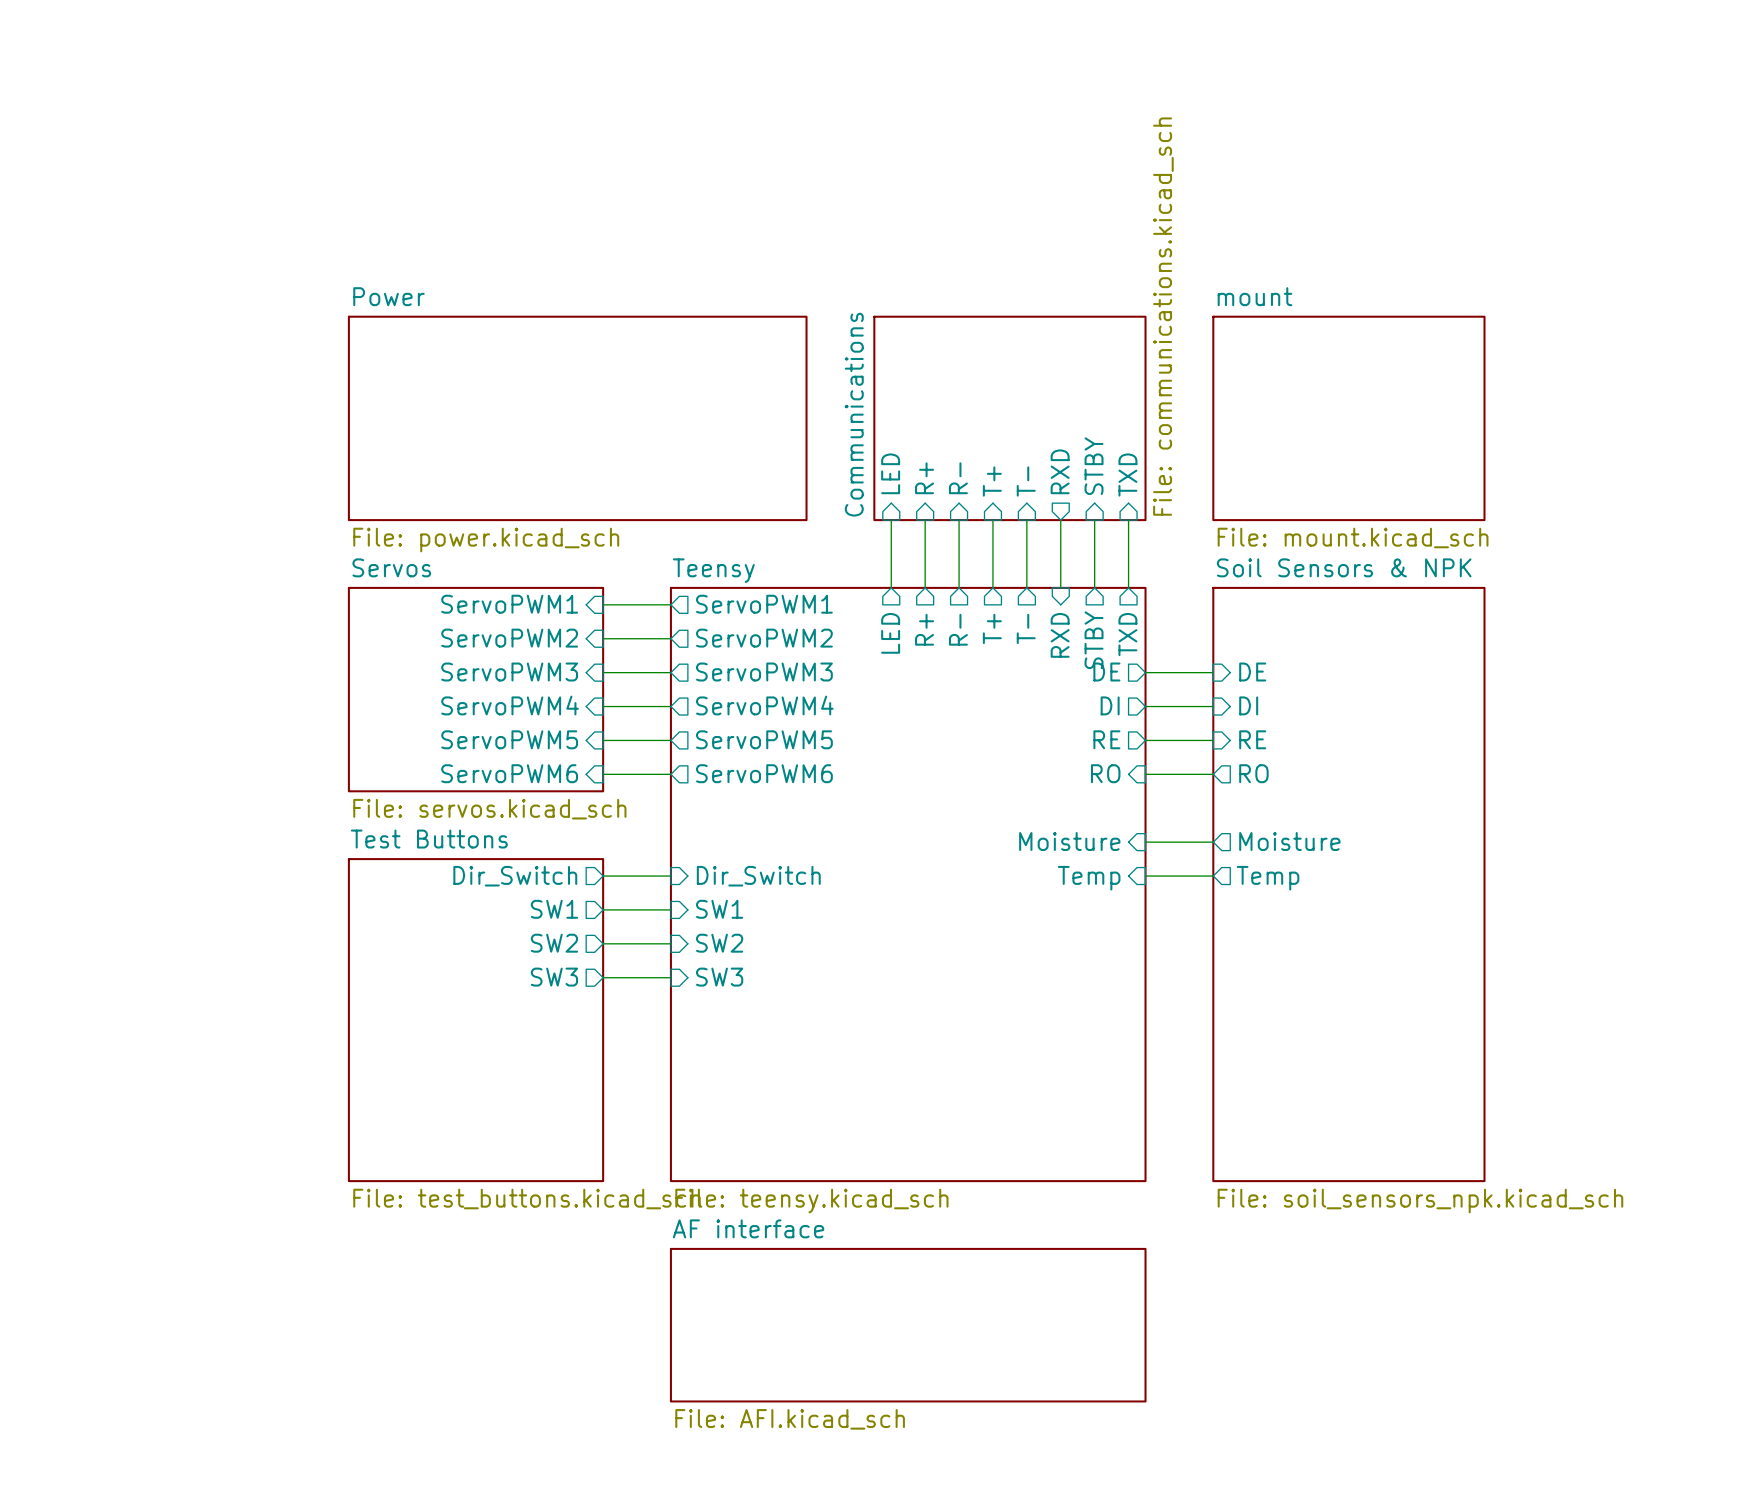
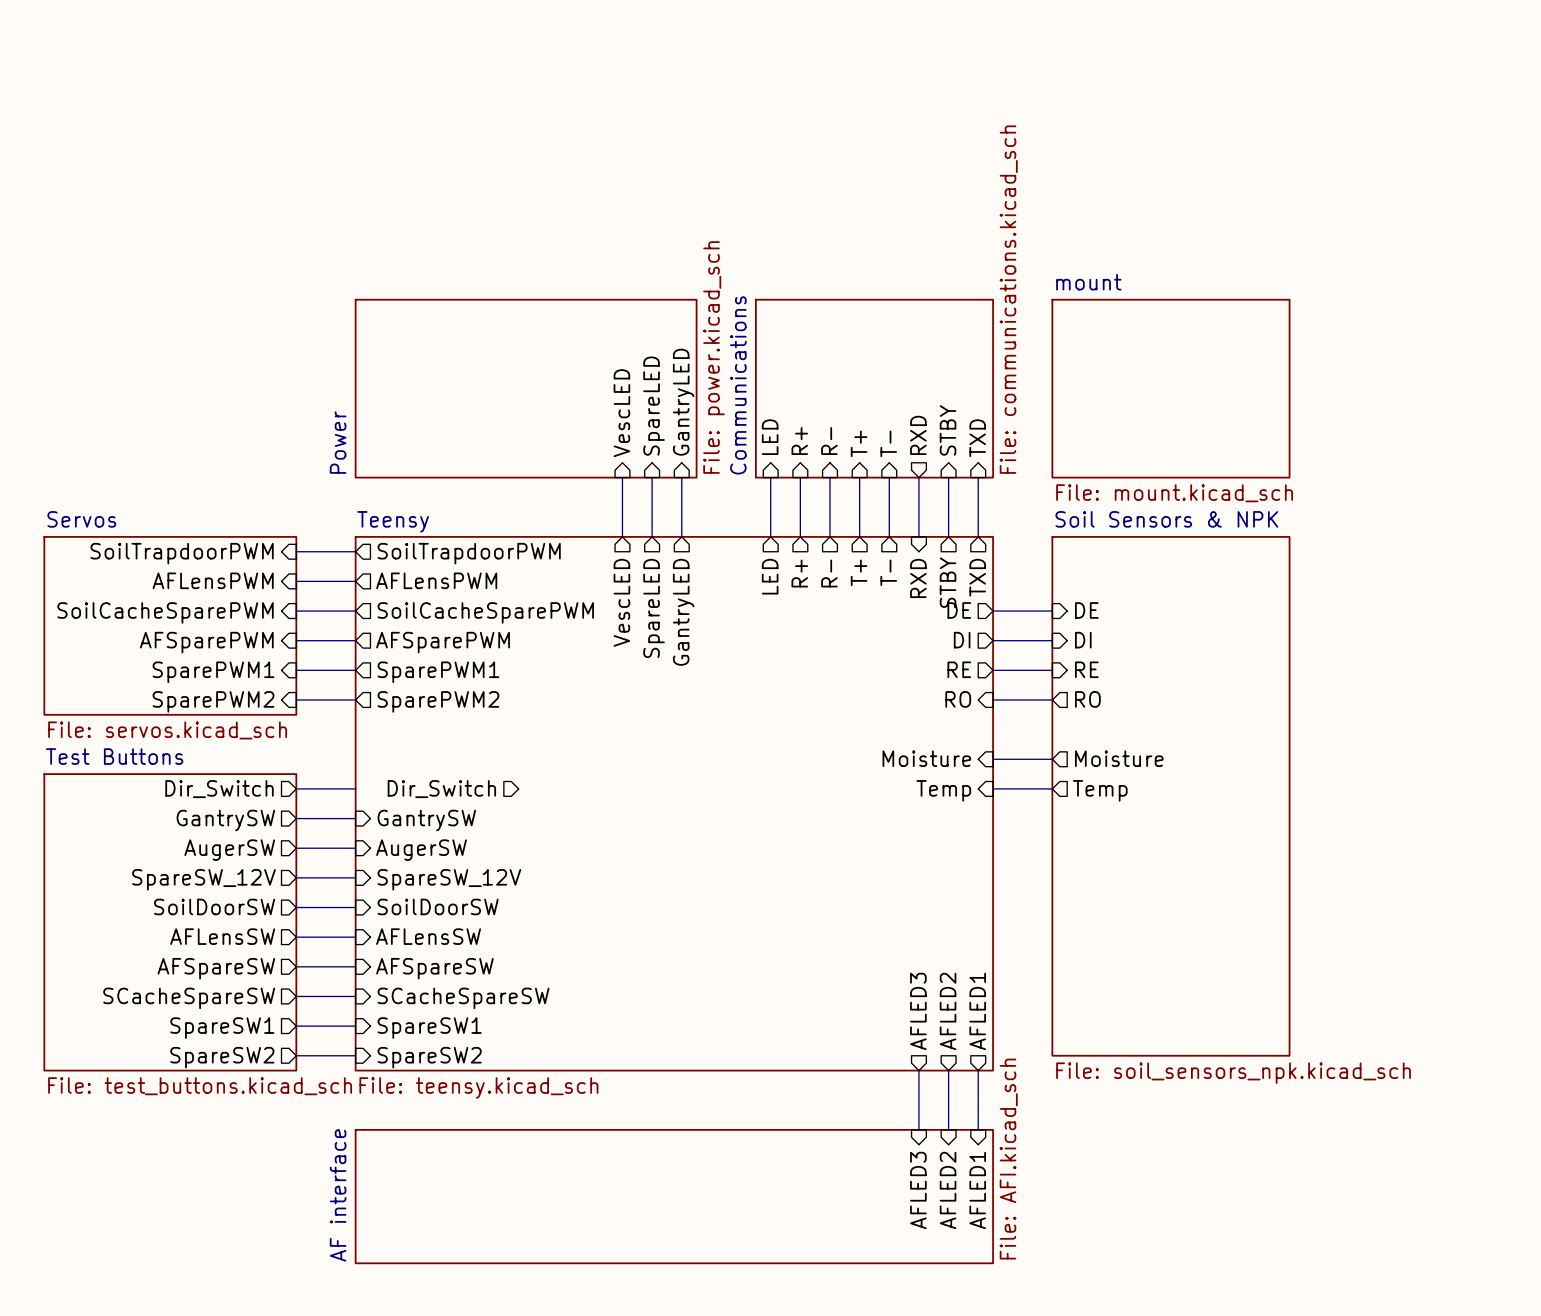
sheet Power: File: power.kicad_sch (577, 418) -> none
sheet Power: none -> File: power.kicad_sch (526, 388)
sheet pin: none -> GantryLED (683, 402)
sheet pin: none -> SpareLED (654, 406)
sheet pin: none -> VescLED (621, 413)
wire: none -> (622, 477) (622, 536)
wire: none -> (652, 477) (652, 536)
wire: none -> (681, 477) (681, 536)
sheet pin: ServoPWM1 (509, 604) -> none
wire: (603, 604) (670, 604) -> (296, 551) (355, 551)
sheet pin: ServoPWM1 (764, 604) -> none
sheet pin: none -> SoilTrapdoorPWM (182, 553)
sheet pin: none -> SoilTrapdoorPWM (469, 553)
sheet pin: none -> AFLensPWM (213, 580)
sheet pin: ServoPWM2 (509, 638) -> none
sheet pin: none -> AFLensPWM (436, 580)
wire: (603, 638) (670, 638) -> (296, 581) (355, 581)
sheet pin: ServoPWM2 (764, 638) -> none
sheet pin: none -> VescLED (621, 602)
sheet pin: none -> SpareLED (654, 608)
sheet pin: ServoPWM3 (509, 672) -> none
wire: (603, 672) (670, 672) -> (296, 611) (355, 611)
sheet pin: ServoPWM3 (764, 672) -> none
sheet pin: none -> SoilCacheSparePWM (165, 612)
sheet pin: none -> SoilCacheSparePWM (485, 612)
sheet pin: none -> GantryLED (683, 612)
sheet Servos: none -> File: servos.kicad_sch (170, 625)
sheet Servos: File: servos.kicad_sch (476, 689) -> none
sheet pin: ServoPWM4 (510, 705) -> none
sheet pin: ServoPWM4 (764, 705) -> none
wire: (603, 706) (670, 706) -> (296, 640) (355, 640)
sheet pin: none -> AFSparePWM (206, 642)
sheet pin: none -> AFSparePWM (443, 642)
sheet pin: ServoPWM5 (509, 739) -> none
sheet pin: ServoPWM5 (764, 739) -> none
wire: (603, 740) (670, 740) -> (296, 670) (355, 670)
sheet pin: none -> SparePWM1 (213, 672)
sheet pin: none -> SparePWM1 (438, 672)
sheet pin: ServoPWM6 (509, 773) -> none
sheet pin: ServoPWM6 (764, 773) -> none
wire: (603, 774) (670, 774) -> (296, 699) (355, 699)
sheet pin: none -> SparePWM2 (213, 701)
sheet pin: none -> SparePWM2 (438, 701)
sheet pin: none -> Dir_Switch (219, 789)
wire: (603, 876) (670, 876) -> (296, 788) (355, 788)
sheet pin: Dir_Switch (758, 876) -> none
sheet Teensy: File: teensy.kicad_sch (908, 884) -> none
sheet Teensy: none -> File: teensy.kicad_sch (674, 803)
sheet pin: SW1 (554, 909) -> none
wire: (603, 909) (670, 909) -> (296, 818) (355, 818)
sheet pin: SW1 (719, 909) -> none
sheet pin: none -> GantrySW (225, 820)
sheet pin: none -> GantrySW (426, 820)
sheet pin: SW2 (554, 943) -> none
wire: (603, 943) (670, 943) -> (296, 848) (355, 848)
sheet pin: SW2 (719, 943) -> none
sheet pin: none -> AugerSW (229, 850)
sheet pin: none -> AugerSW (421, 850)
sheet pin: SW3 (554, 977) -> none
wire: (603, 977) (670, 977) -> (296, 877) (355, 877)
sheet pin: SW3 (719, 977) -> none
sheet pin: none -> SpareSW_12V (203, 879)
sheet pin: none -> SpareSW_12V (449, 879)
sheet pin: none -> SoilDoorSW (214, 906)
sheet pin: none -> SoilDoorSW (438, 906)
wire: none -> (296, 907) (355, 907)
sheet Test Buttons: File: test_buttons.kicad_sch (476, 1020) -> none
sheet Test Buttons: none -> File: test_buttons.kicad_sch (170, 922)
sheet pin: none -> AFLensSW (222, 936)
sheet pin: none -> AFLensSW (428, 936)
wire: none -> (296, 937) (355, 937)
wire: none -> (296, 966) (355, 966)
sheet pin: none -> AFSpareSW (216, 968)
sheet pin: none -> AFSpareSW (434, 968)
wire: none -> (296, 996) (355, 996)
sheet pin: none -> SCacheSpareSW (189, 998)
sheet pin: none -> SCacheSpareSW (463, 998)
sheet pin: none -> AFLED3 (918, 1011)
sheet pin: none -> AFLED2 (948, 1011)
sheet pin: none -> AFLED1 (977, 1011)
wire: none -> (296, 1026) (355, 1026)
sheet pin: none -> SpareSW1 (222, 1028)
sheet pin: none -> SpareSW1 (429, 1028)
sheet pin: none -> SpareSW2 (222, 1057)
sheet pin: none -> SpareSW2 (429, 1057)
wire: none -> (918, 1070) (918, 1129)
wire: none -> (948, 1070) (948, 1129)
wire: none -> (978, 1070) (978, 1129)
sheet AF interface: File: AFI.kicad_sch (908, 1325) -> none
sheet pin: none -> AFLED3 (918, 1190)
sheet pin: none -> AFLED2 (948, 1190)
sheet pin: none -> AFLED1 (977, 1190)
sheet AF interface: none -> File: AFI.kicad_sch (674, 1196)

